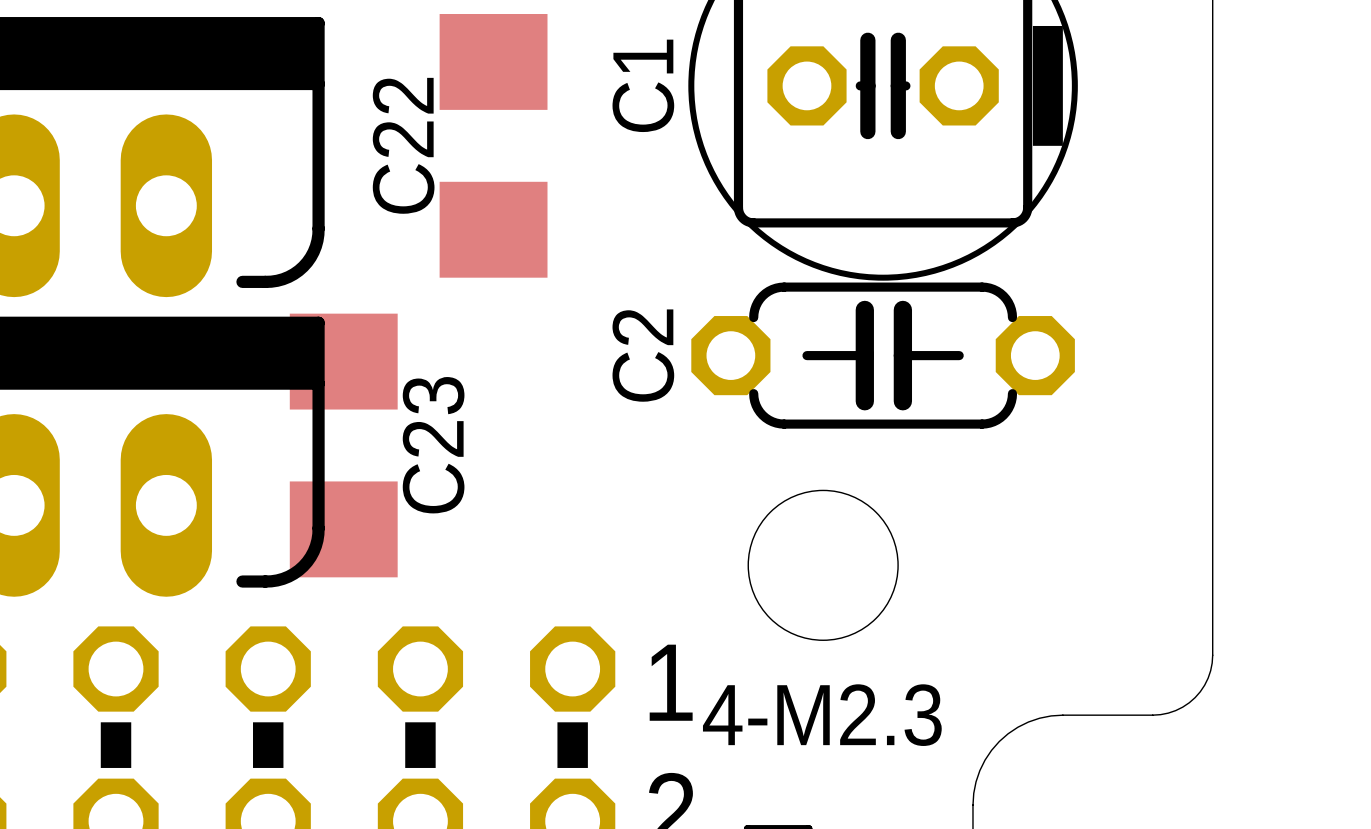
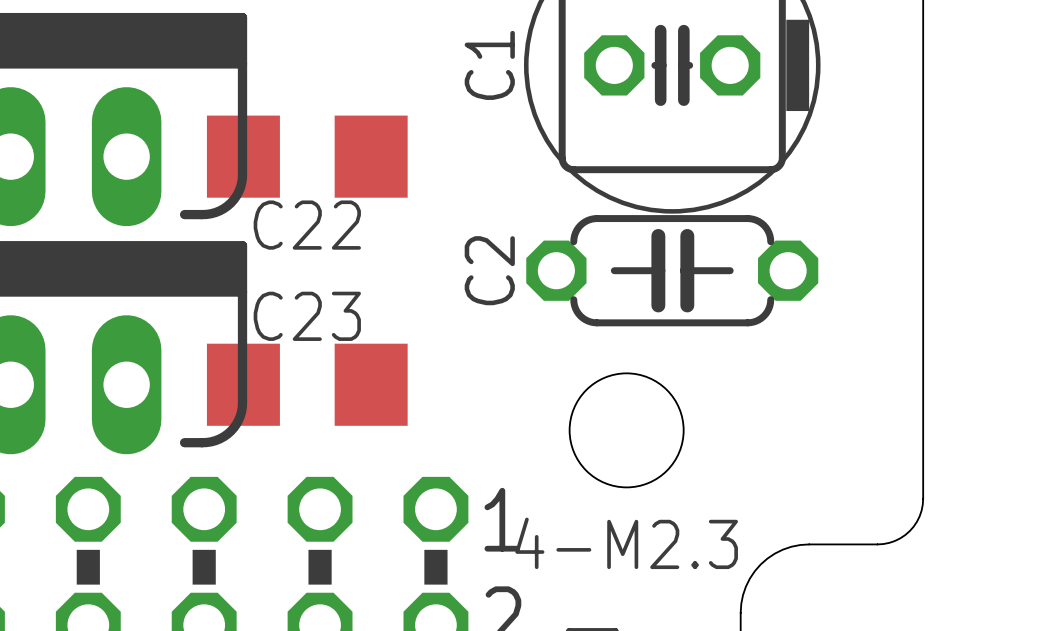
C22 name position: C22 (403, 145) -> C22 (307, 225)
C22 rotation: 0° (493, 145) -> 90° clockwise (307, 156)
C23 rotation: 0° (343, 445) -> 90° clockwise (307, 384)
C23 name position: C23 (433, 445) -> C23 (307, 316)

